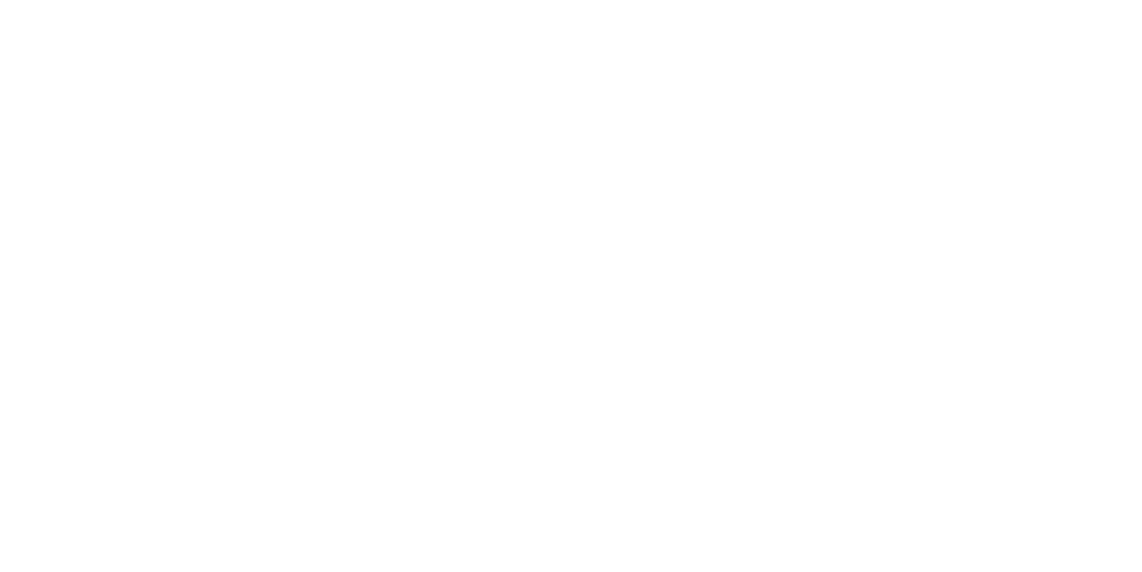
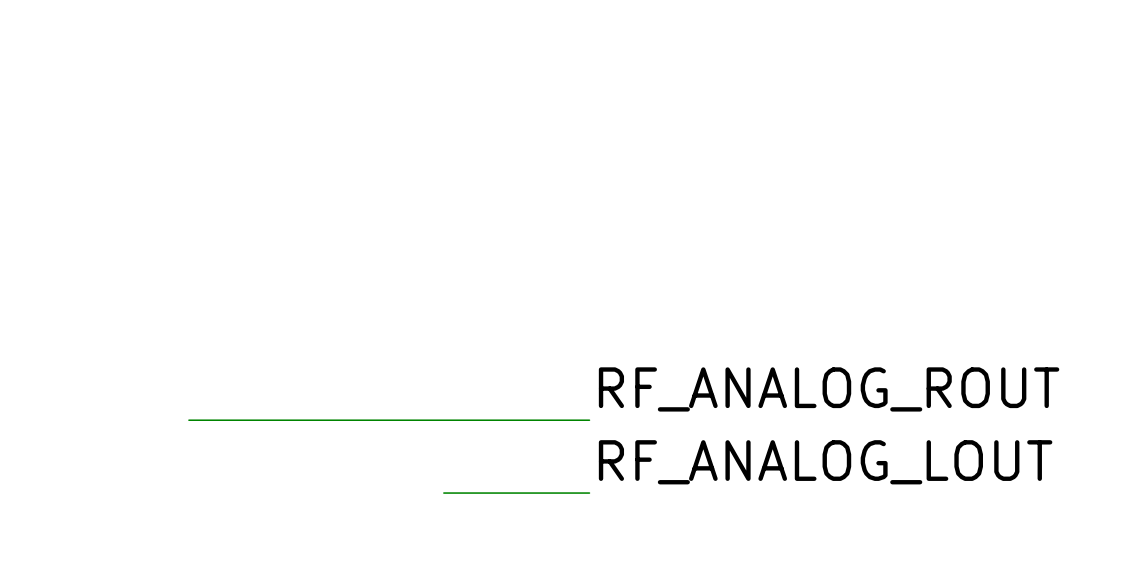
label: none -> RF_ANALOG_ROUT (829, 389)
wire: none -> (188, 420) (589, 420)
label: none -> RF_ANALOG_LOUT (825, 462)
wire: none -> (443, 493) (589, 493)

